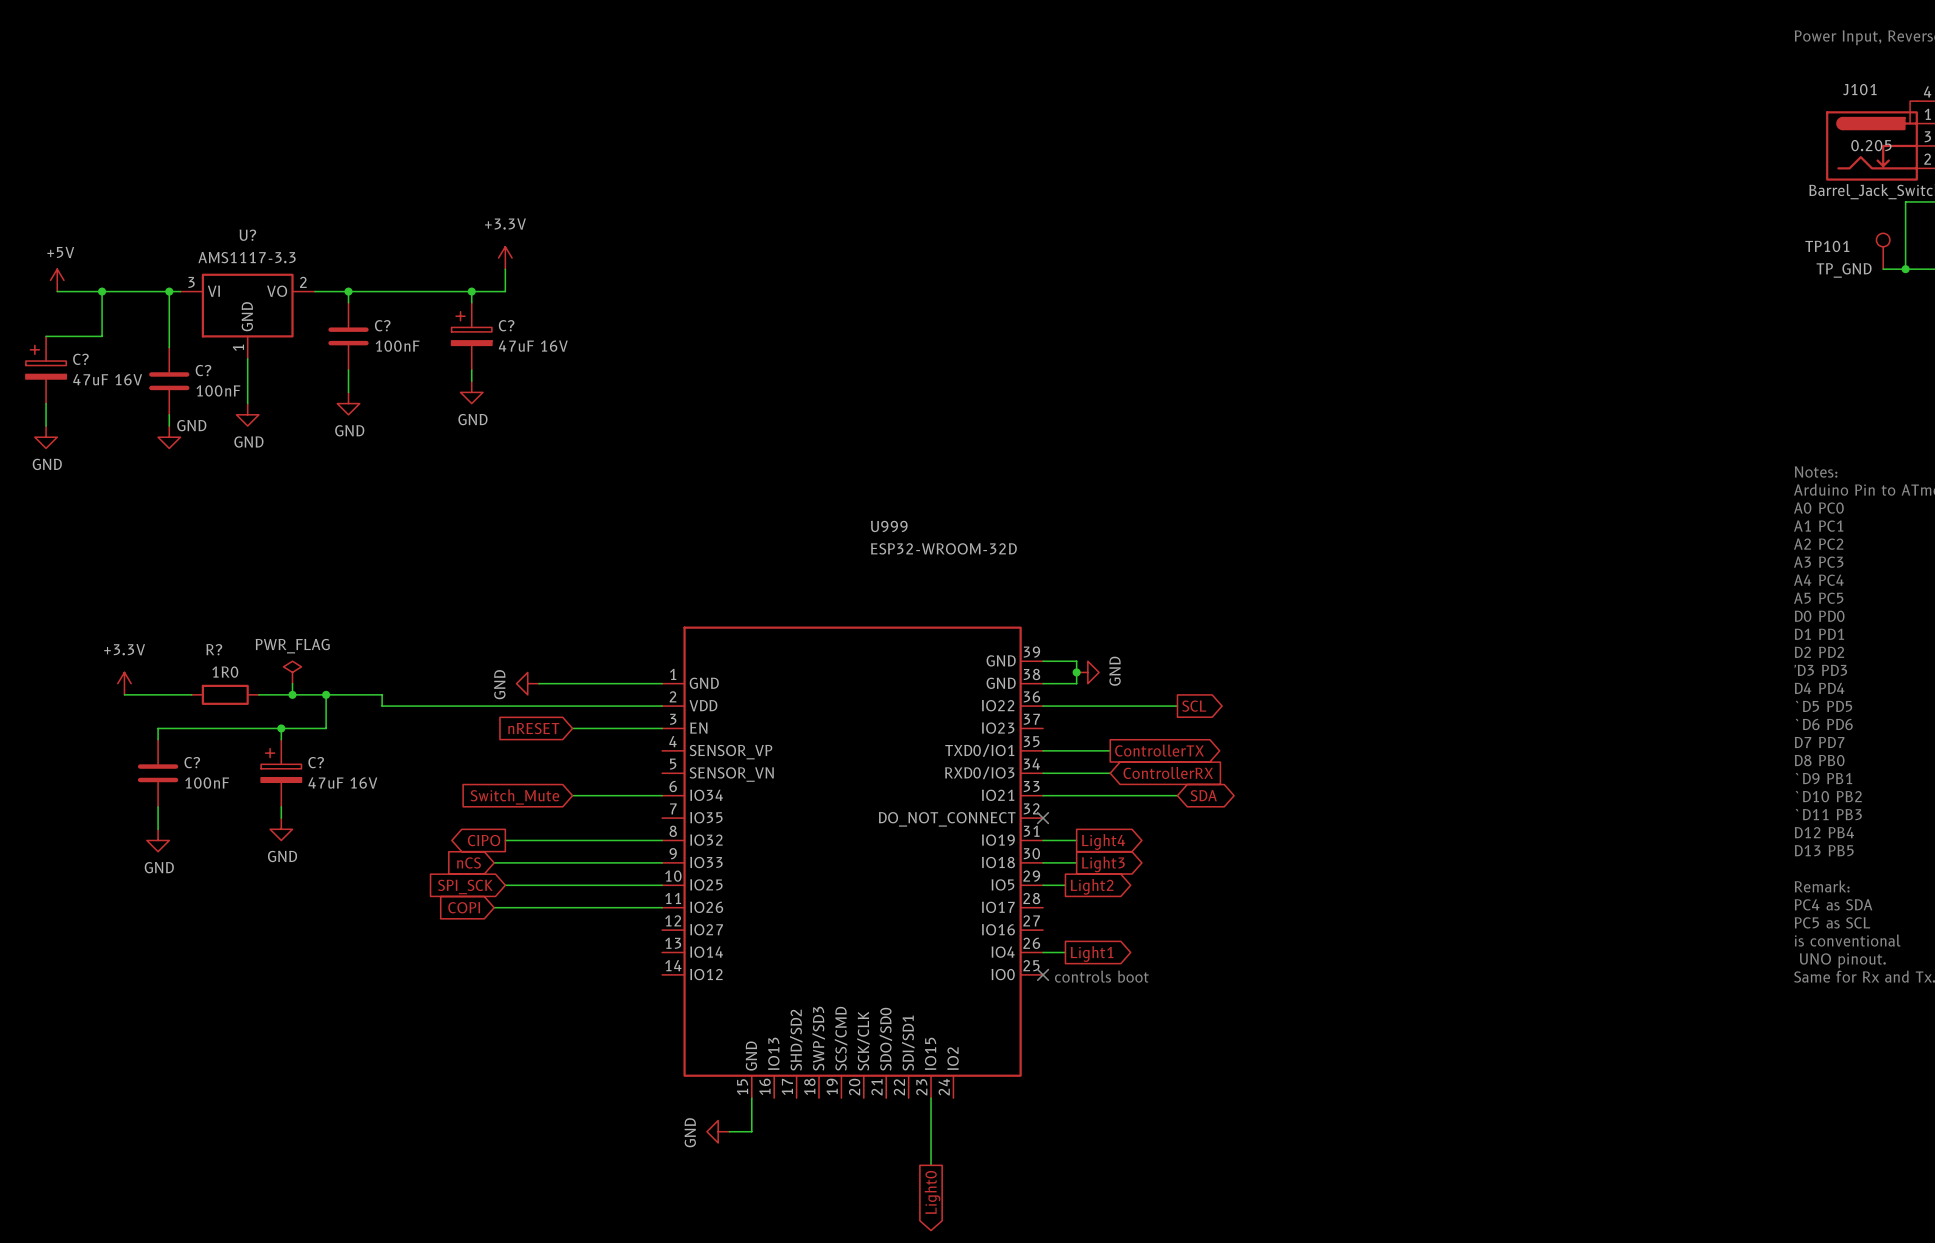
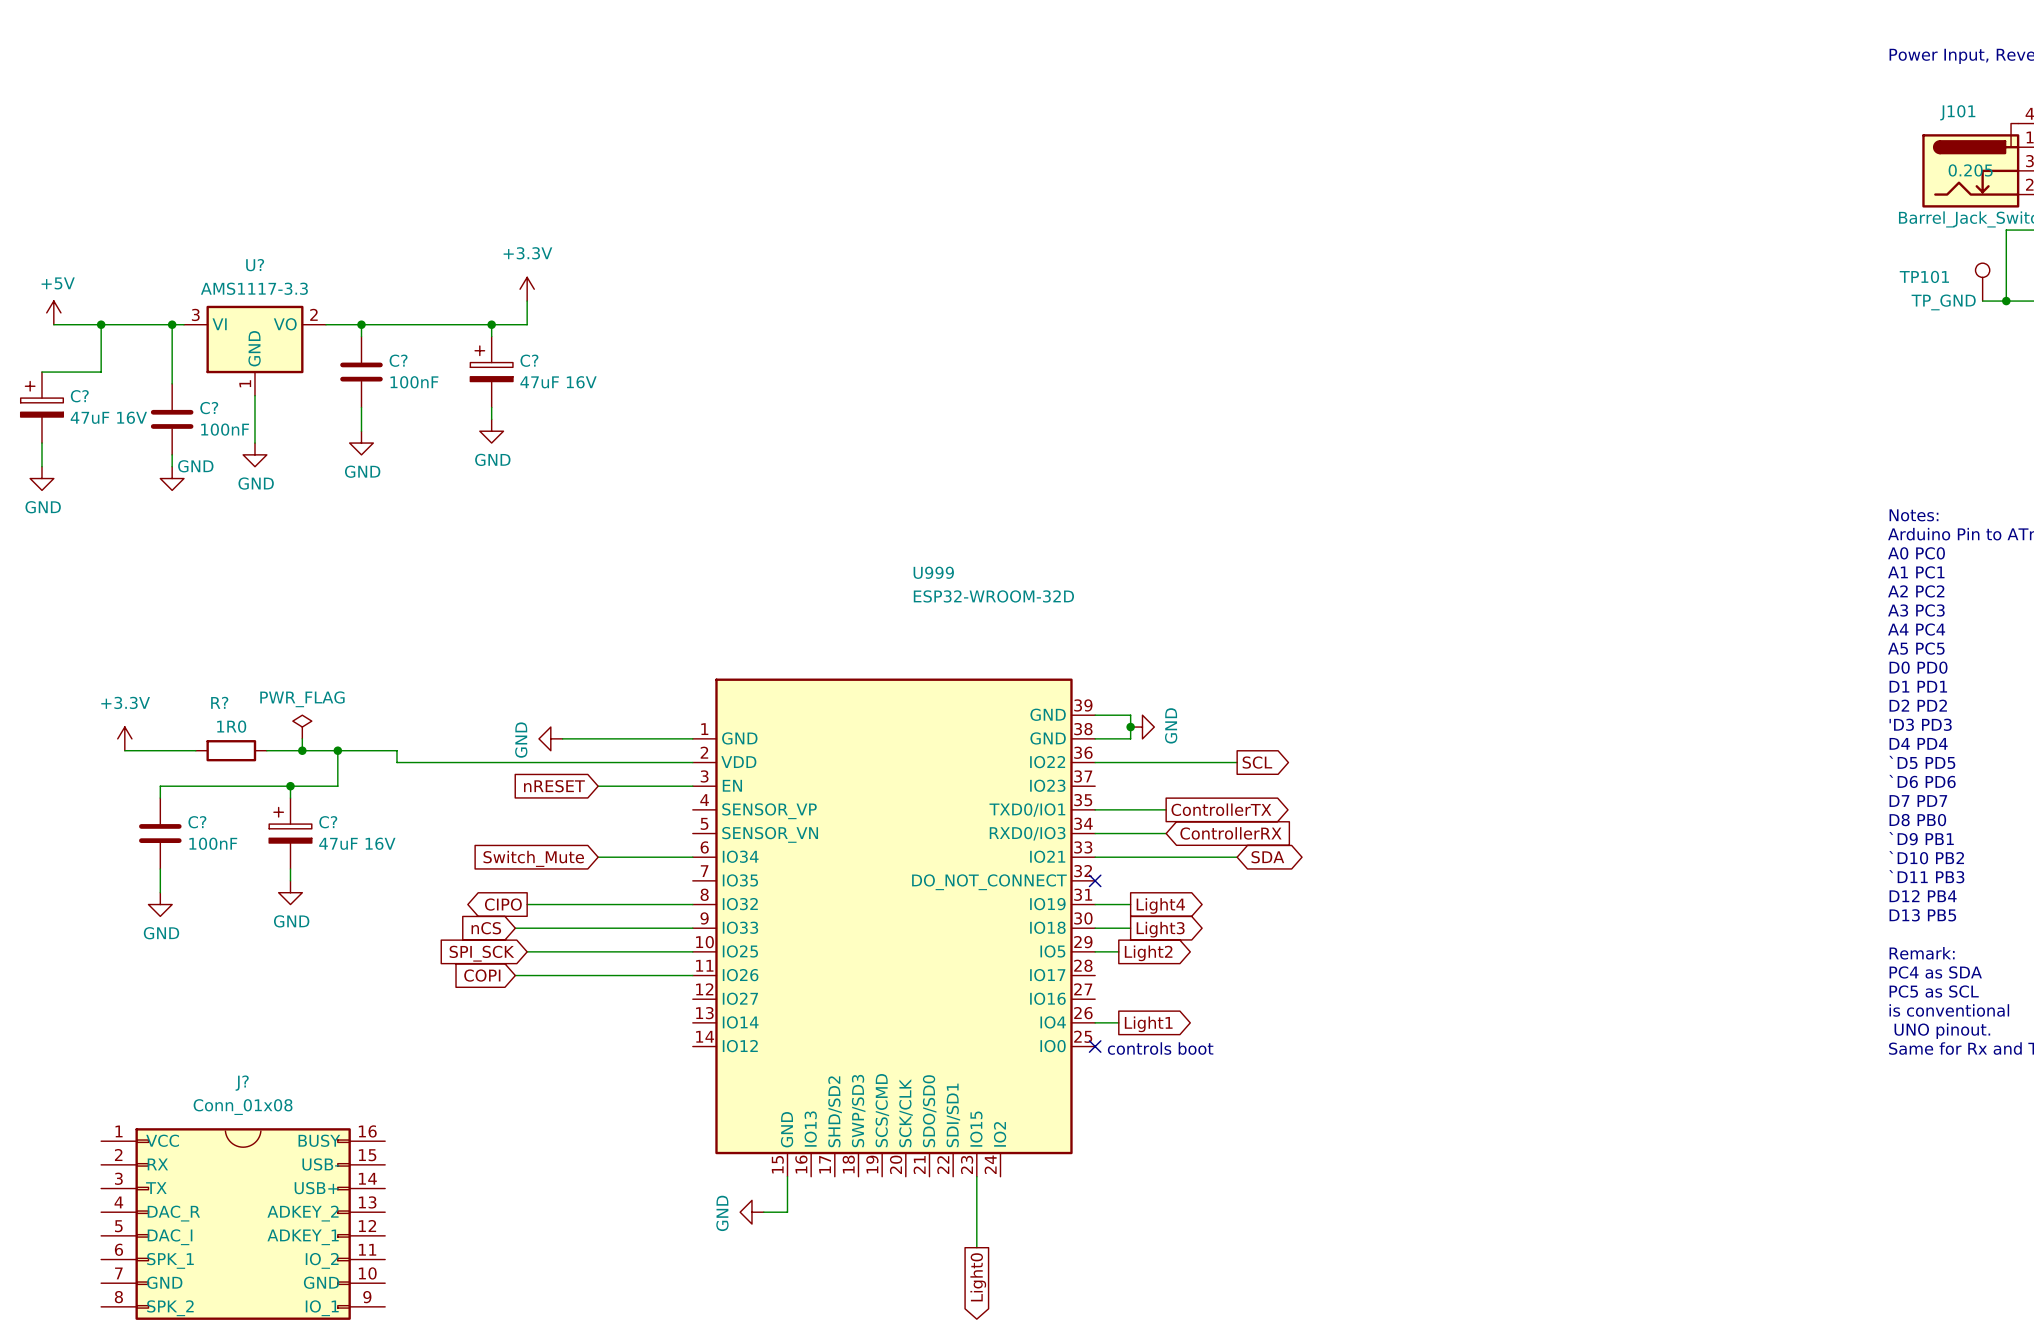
J?: none -> Conn_01x08 (243, 1224)

